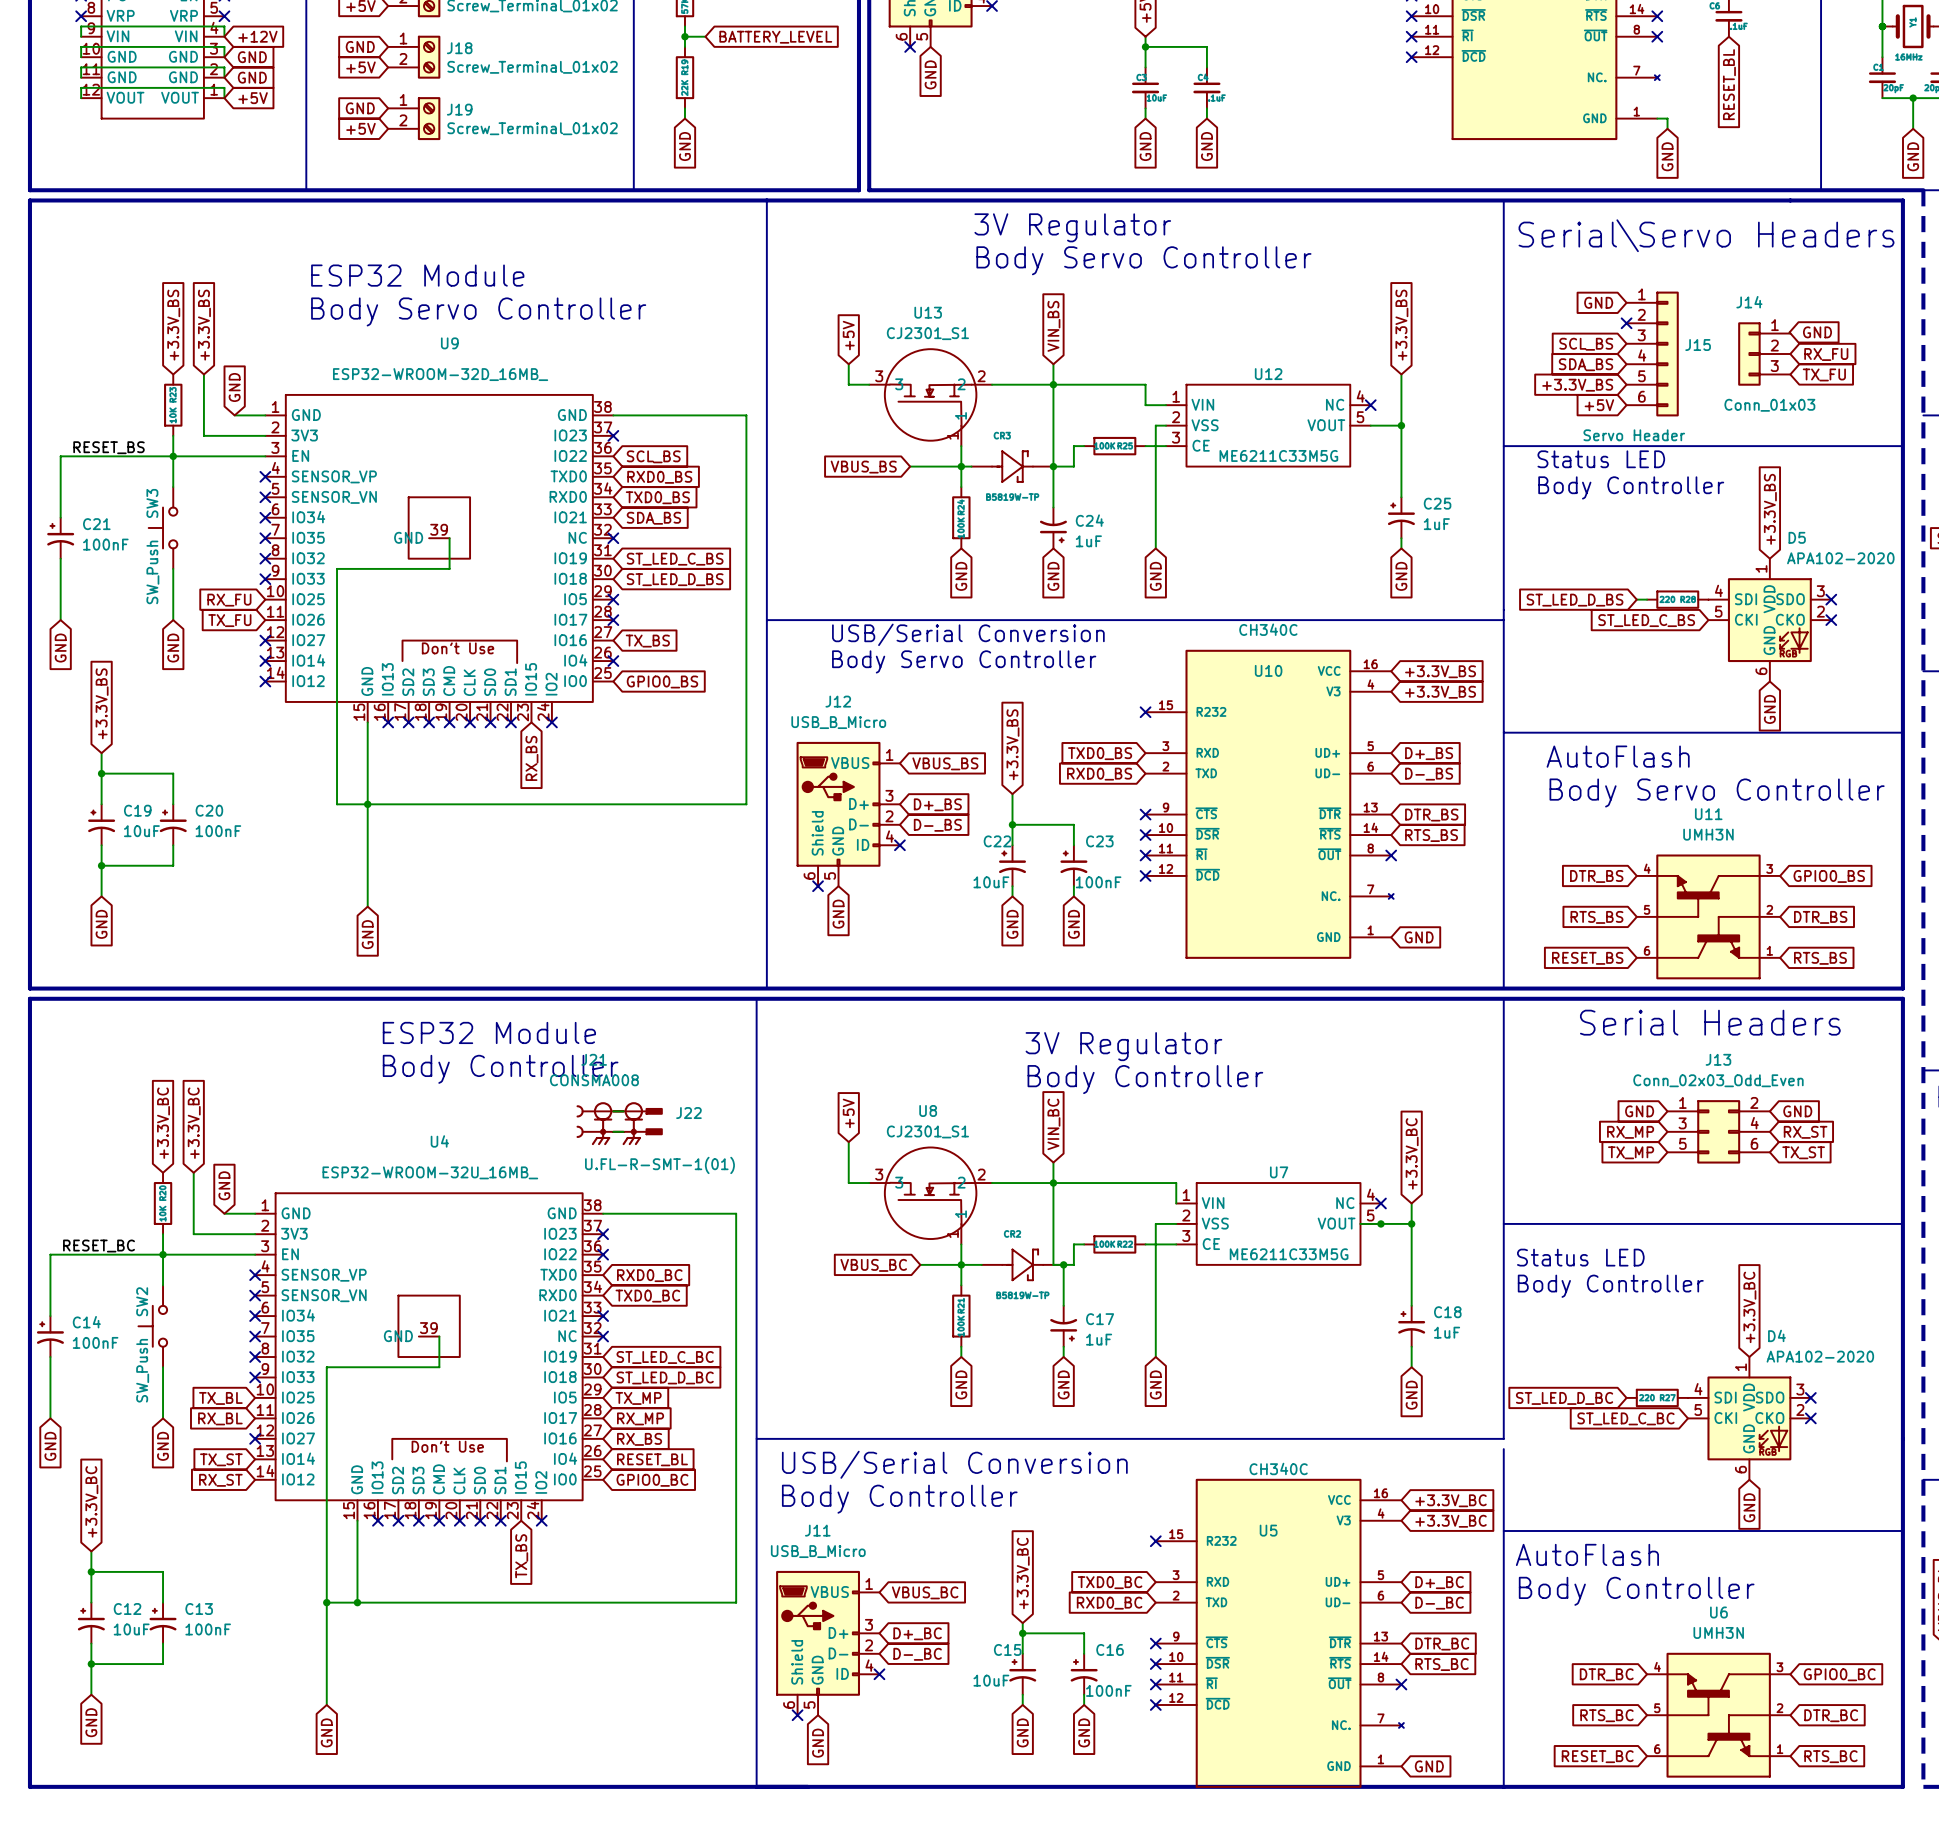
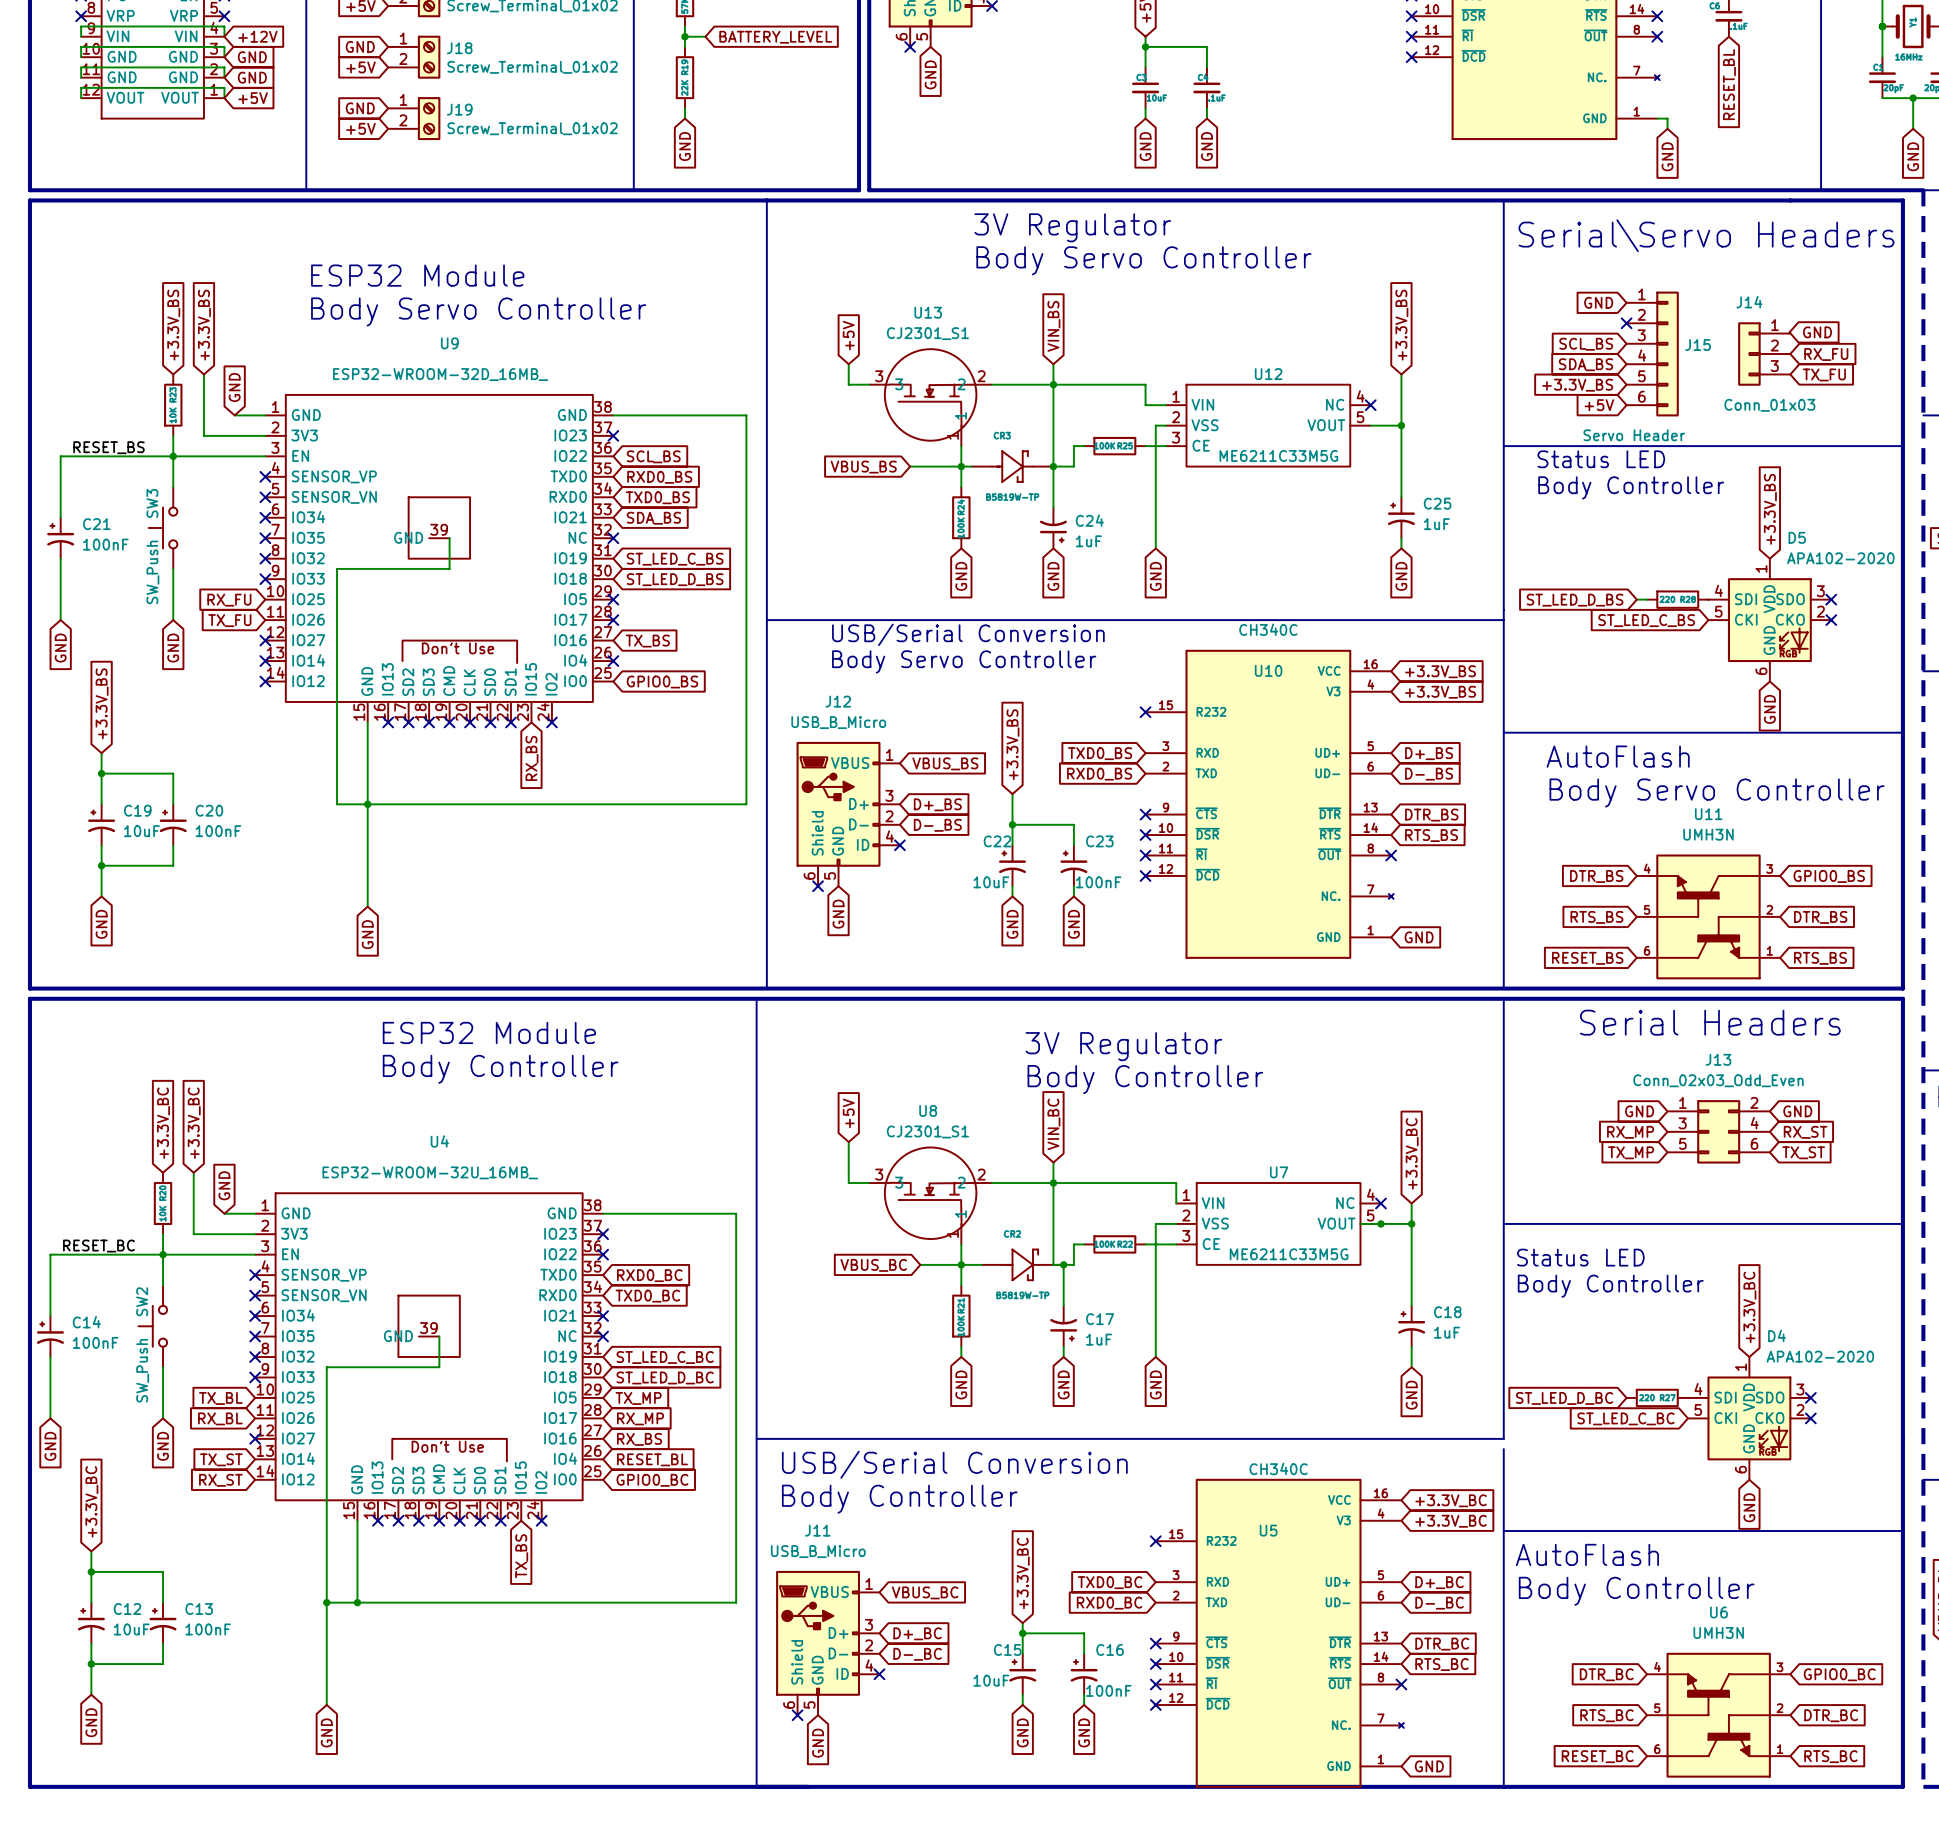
wire: (613, 1111) (623, 1111) -> none
J21: CONSMA008 (600, 1123) -> none
J22: U.FL-R-SMT-1(01) (637, 1123) -> none
wire: (613, 1131) (623, 1131) -> none

